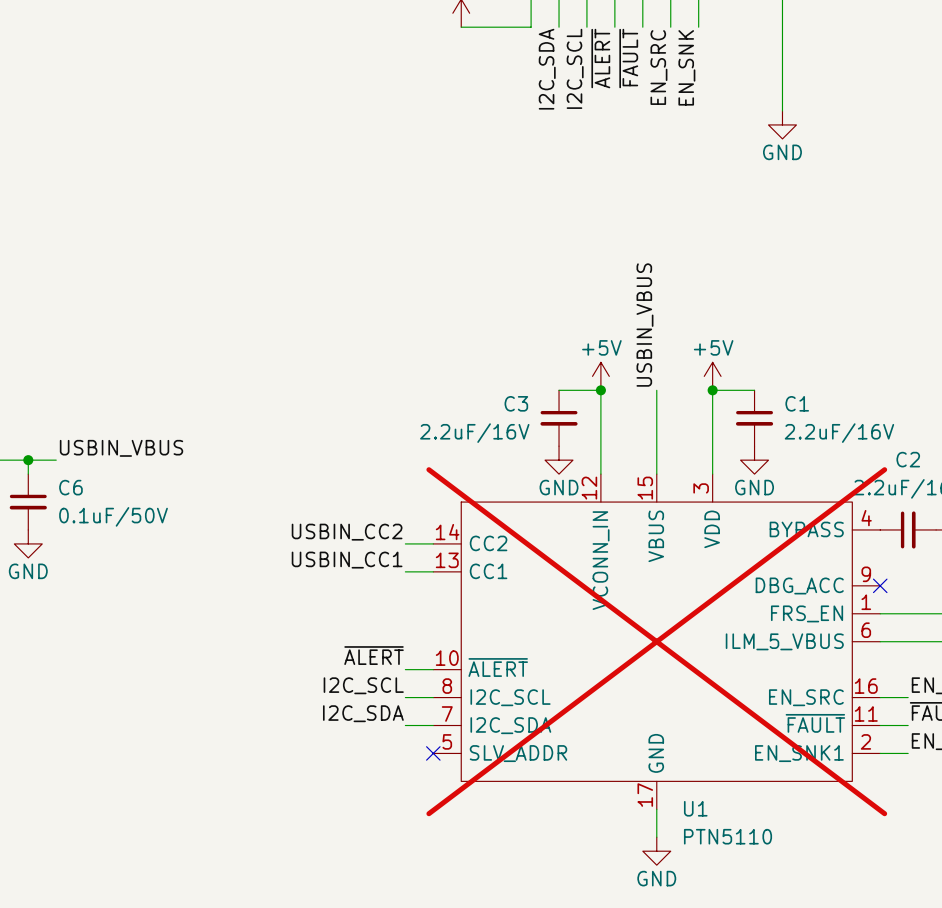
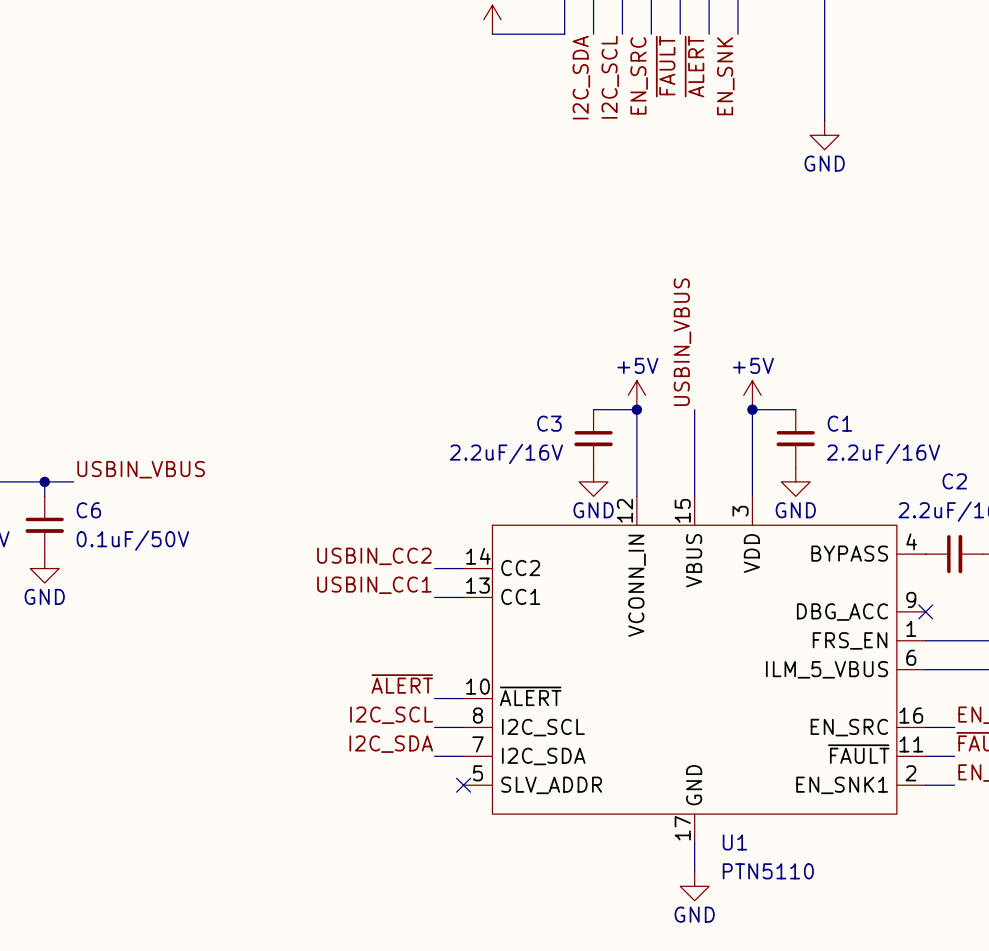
label: ~{ALERT} (600, 58) -> EN_SRC (639, 75)
label: EN_SRC (658, 67) -> ~{ALERT} (694, 66)
U1 do-not-place cross: (656, 641) -> none

